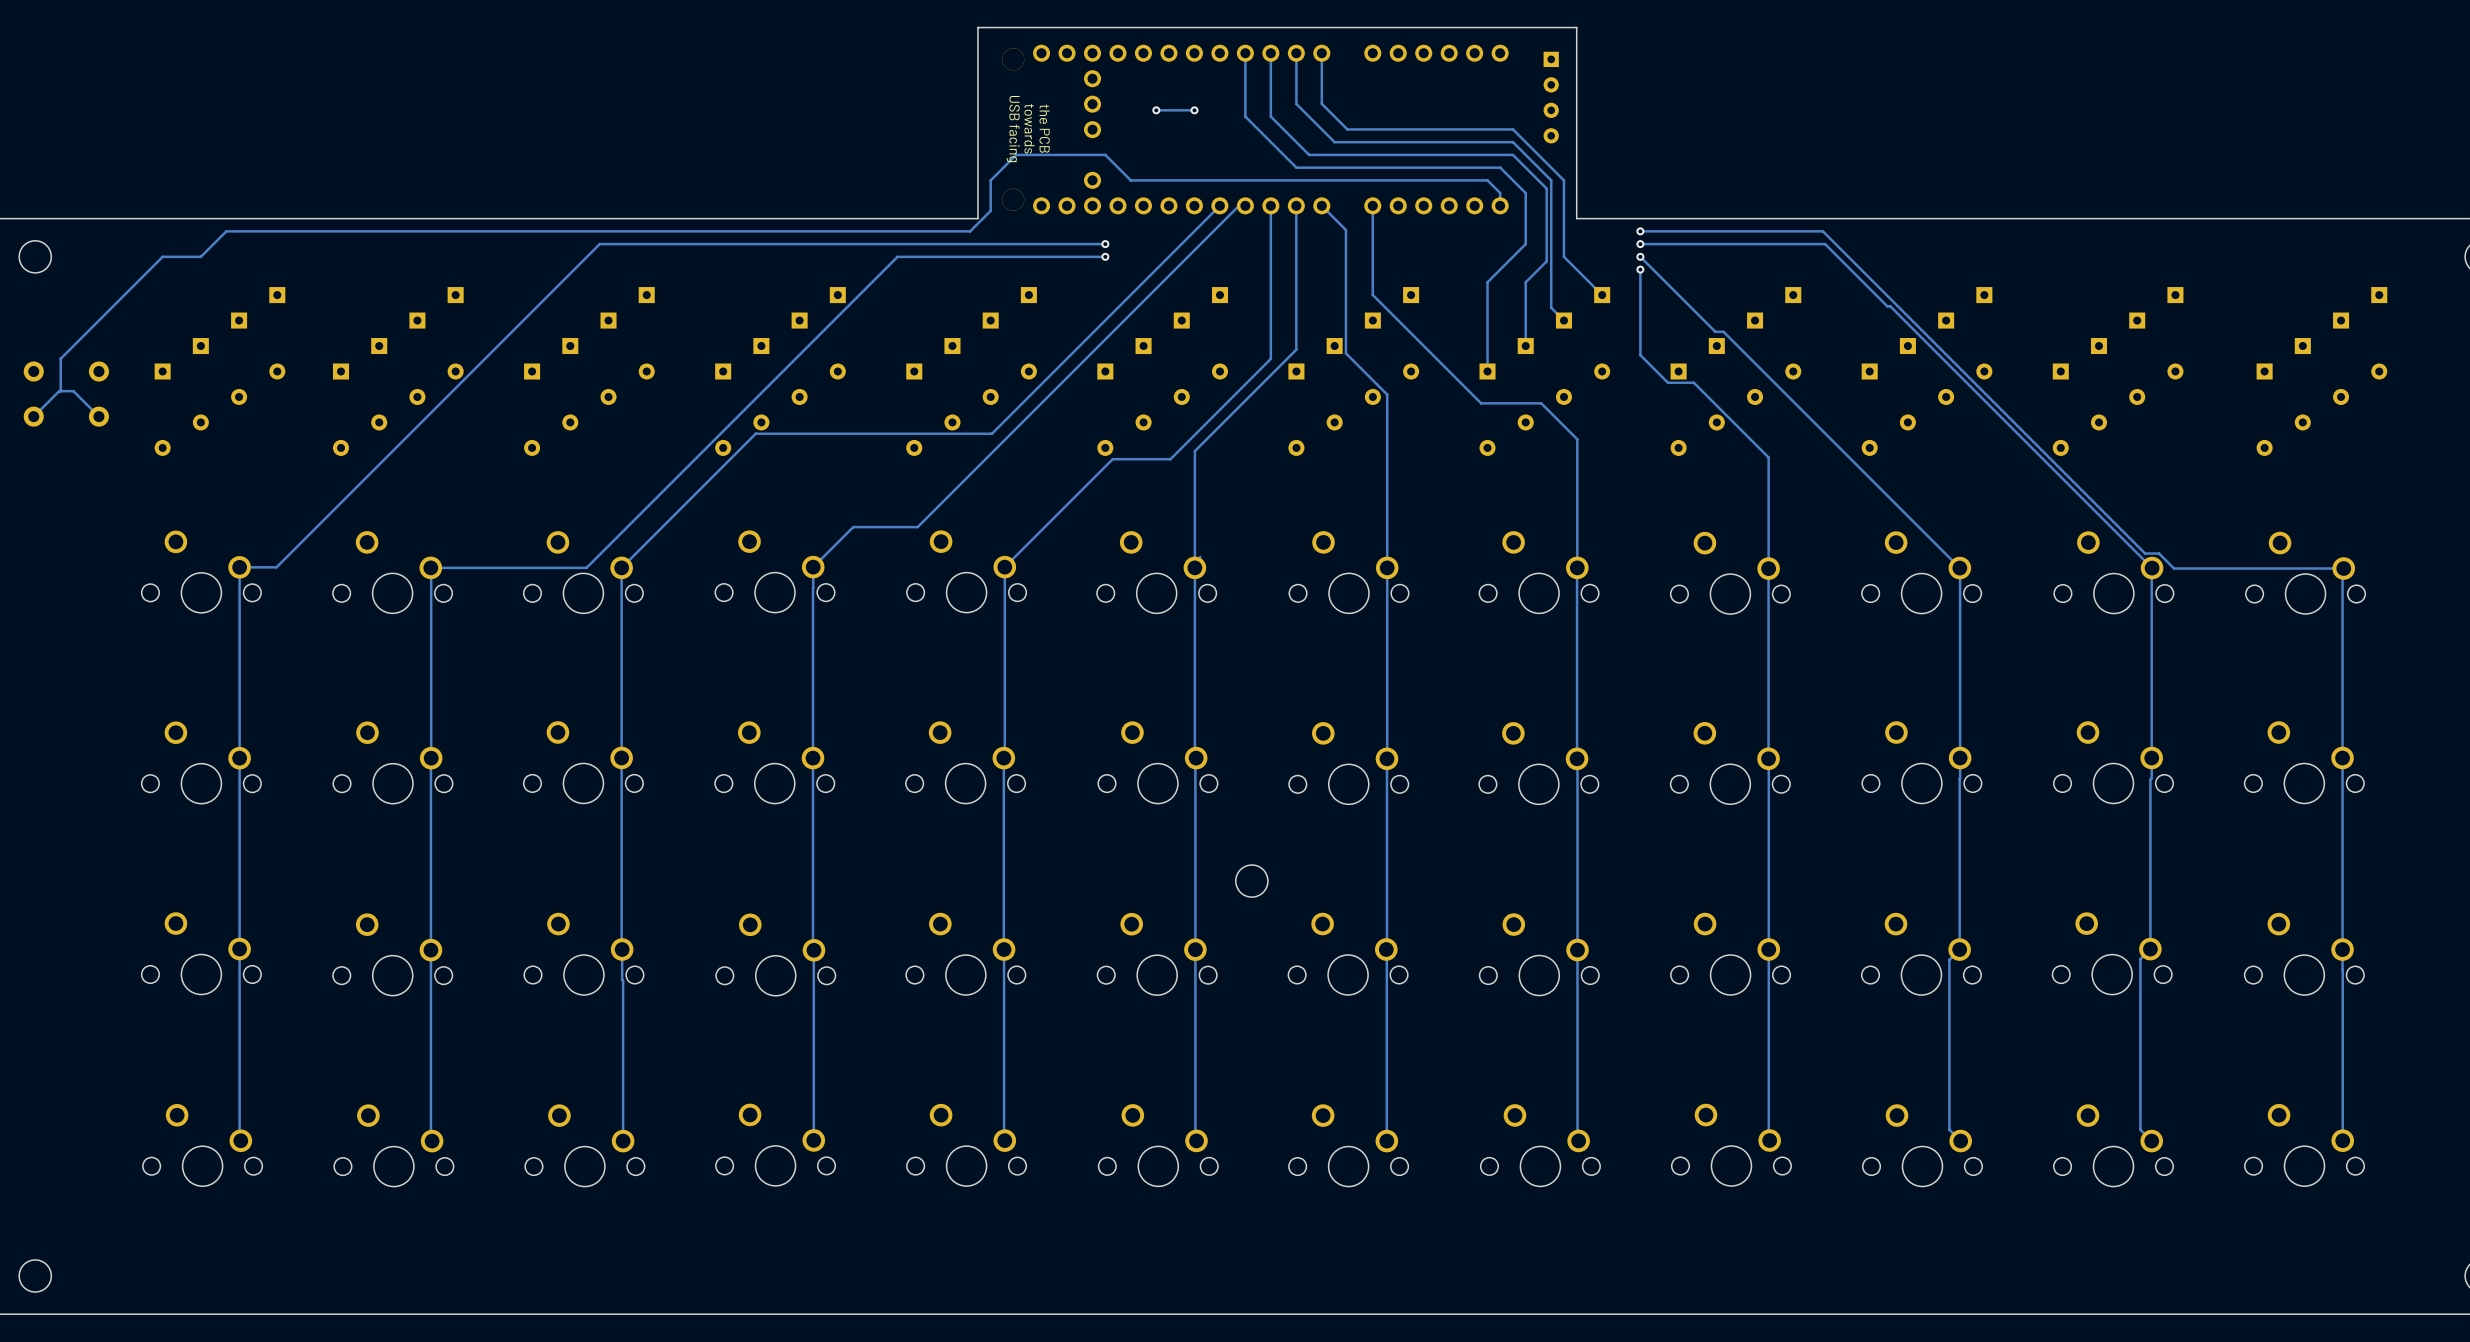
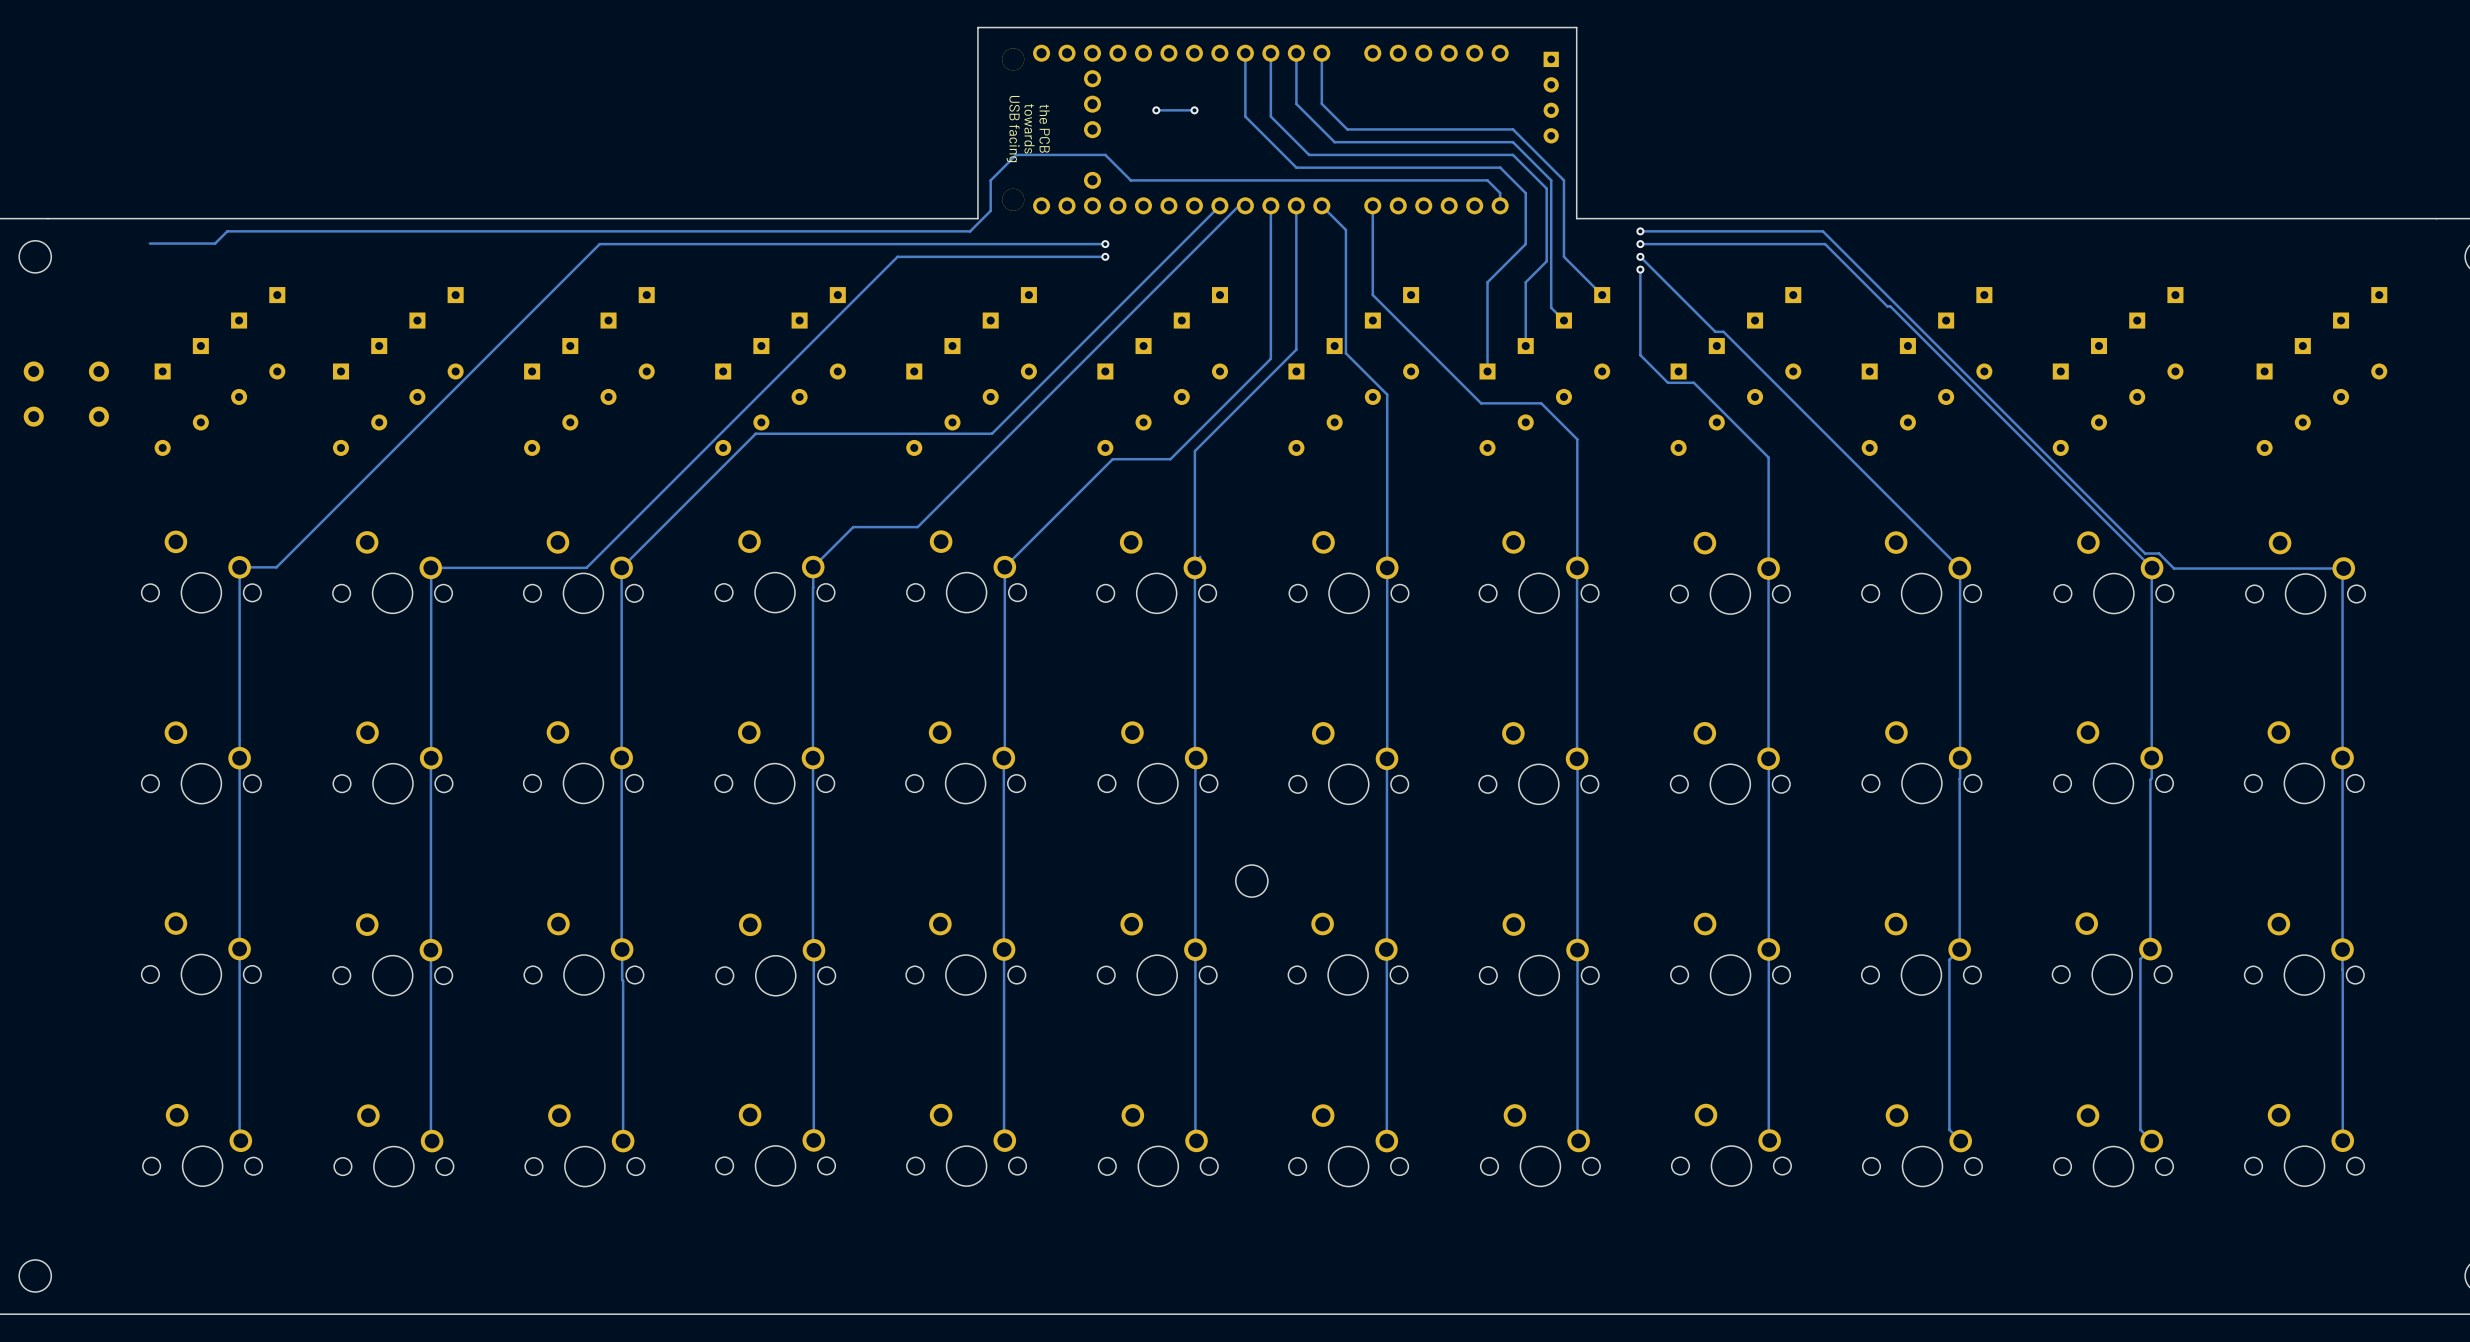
track: (227, 231) (200, 256) (162, 256) (60, 358) (60, 391) -> (227, 231) (215, 243) (149, 243)
track: (98, 416) (73, 391) (59, 391) (33, 416) -> none

